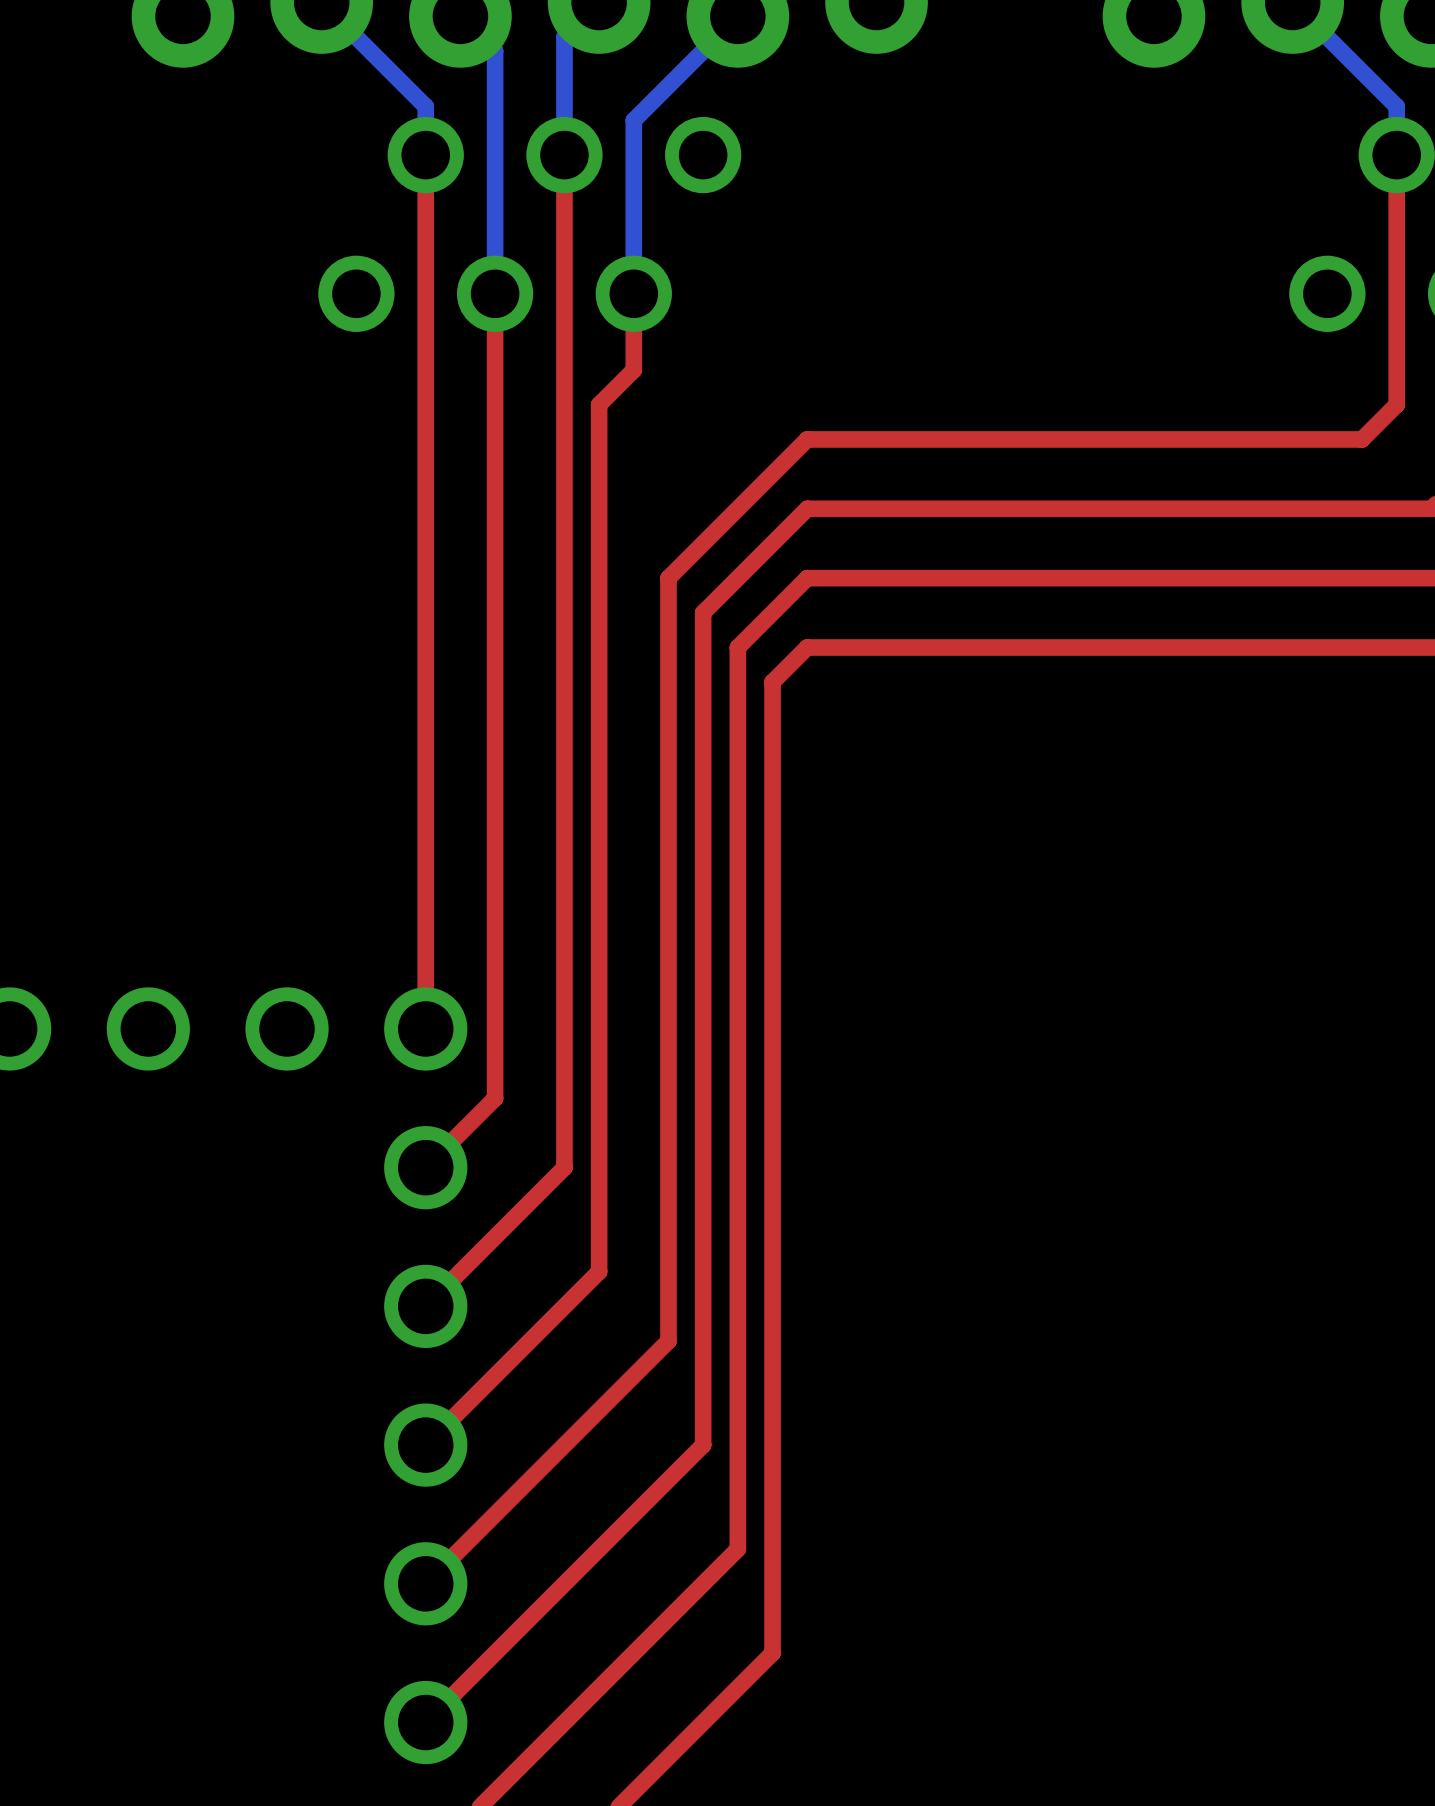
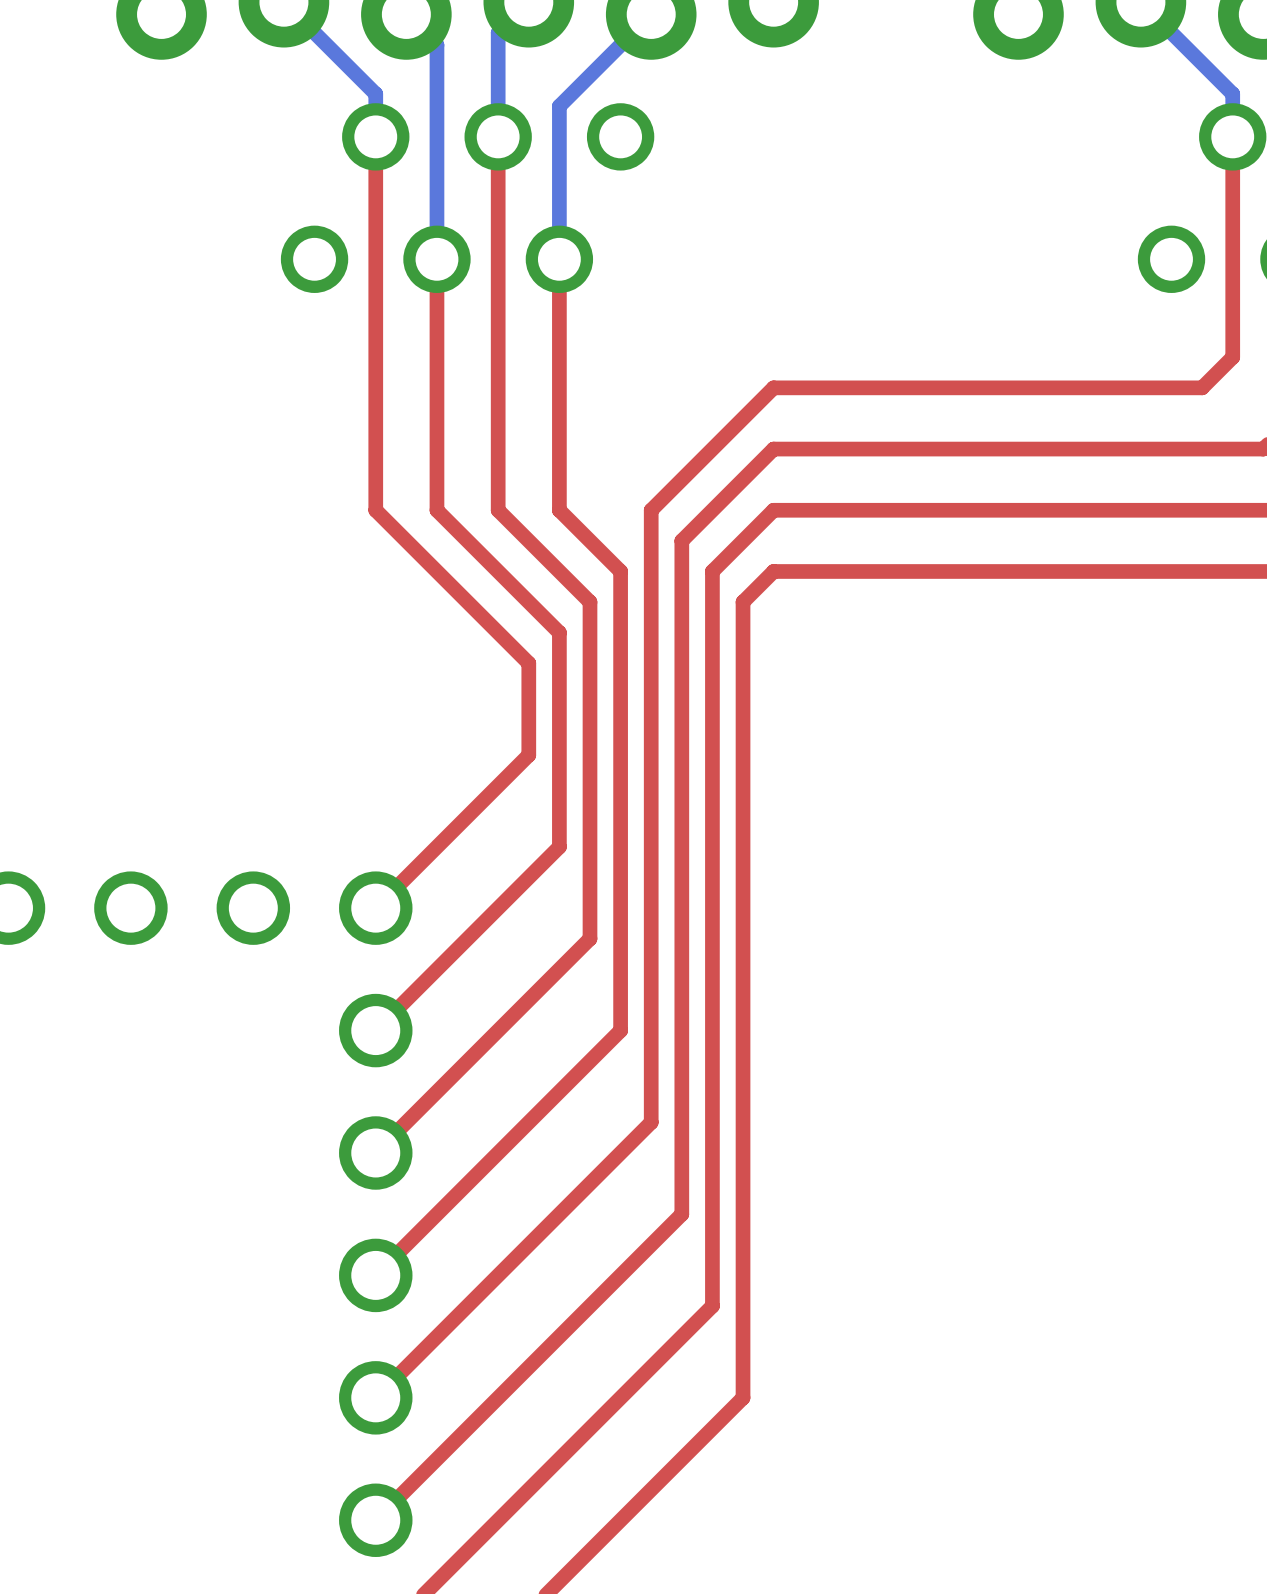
top track: (633, 370) (599, 404) (599, 751) -> (559, 326) (559, 510) (620, 571)
top track: (876, 439) (807, 439) (668, 578) (668, 682) -> (773, 387) (712, 449)
top track: (876, 508) (807, 508) -> (773, 449) (712, 510)
top track: (425, 578) (425, 1028) -> (375, 510) (528, 663)
top track: (495, 578) (495, 1098) -> (436, 510) (559, 632) (559, 846) (436, 969)
top track: (564, 578) (564, 1167) -> (498, 510) (590, 602)
top track: (737, 578) (703, 612) (703, 647) -> (651, 510) (651, 571)
top track: (876, 578) (807, 578) -> (773, 510) (712, 571) (712, 1306) (651, 1367)
top track: (772, 612) (737, 647) -> (681, 540) (681, 602)
top track: (876, 647) (807, 647) (772, 682) -> (773, 571) (743, 602) (743, 1397) (681, 1459)
top track: (599, 855) (599, 1271) -> (528, 755) (375, 908)
top track: (668, 1063) (668, 1341) -> (590, 938) (498, 1030)
top track: (703, 1167) (703, 1445) -> (620, 1030) (528, 1122)
top track: (737, 1271) (737, 1549) -> (651, 1122) (590, 1183)
top track: (772, 1375) (772, 1653) -> (681, 1214) (620, 1275)

